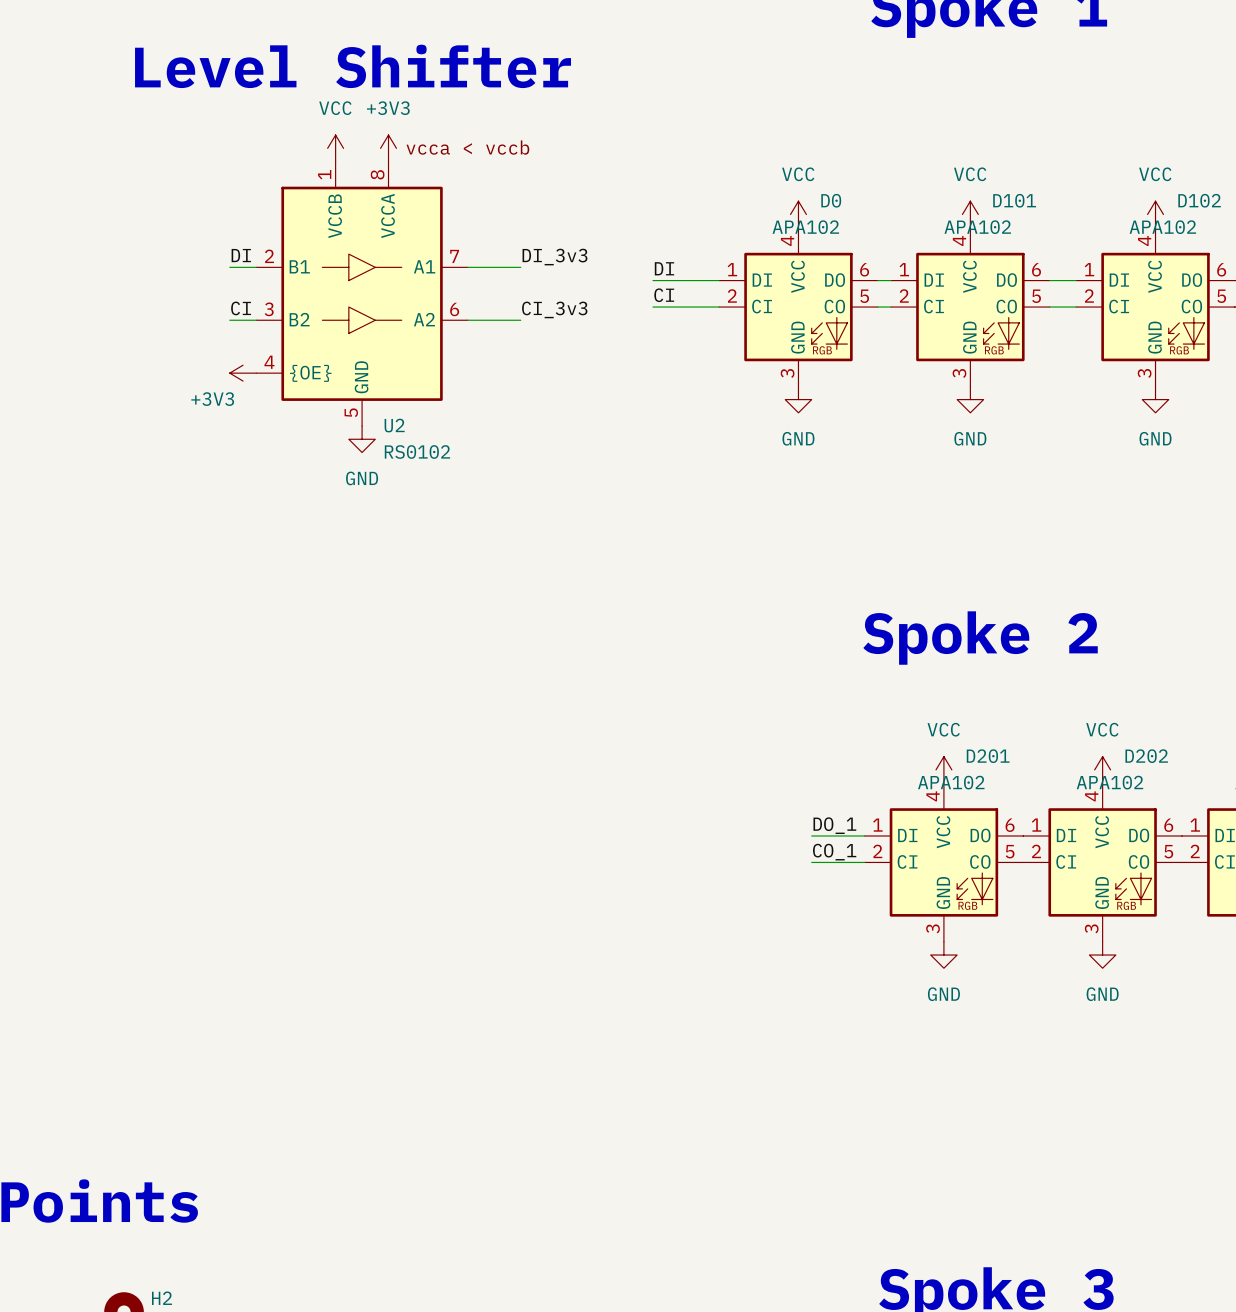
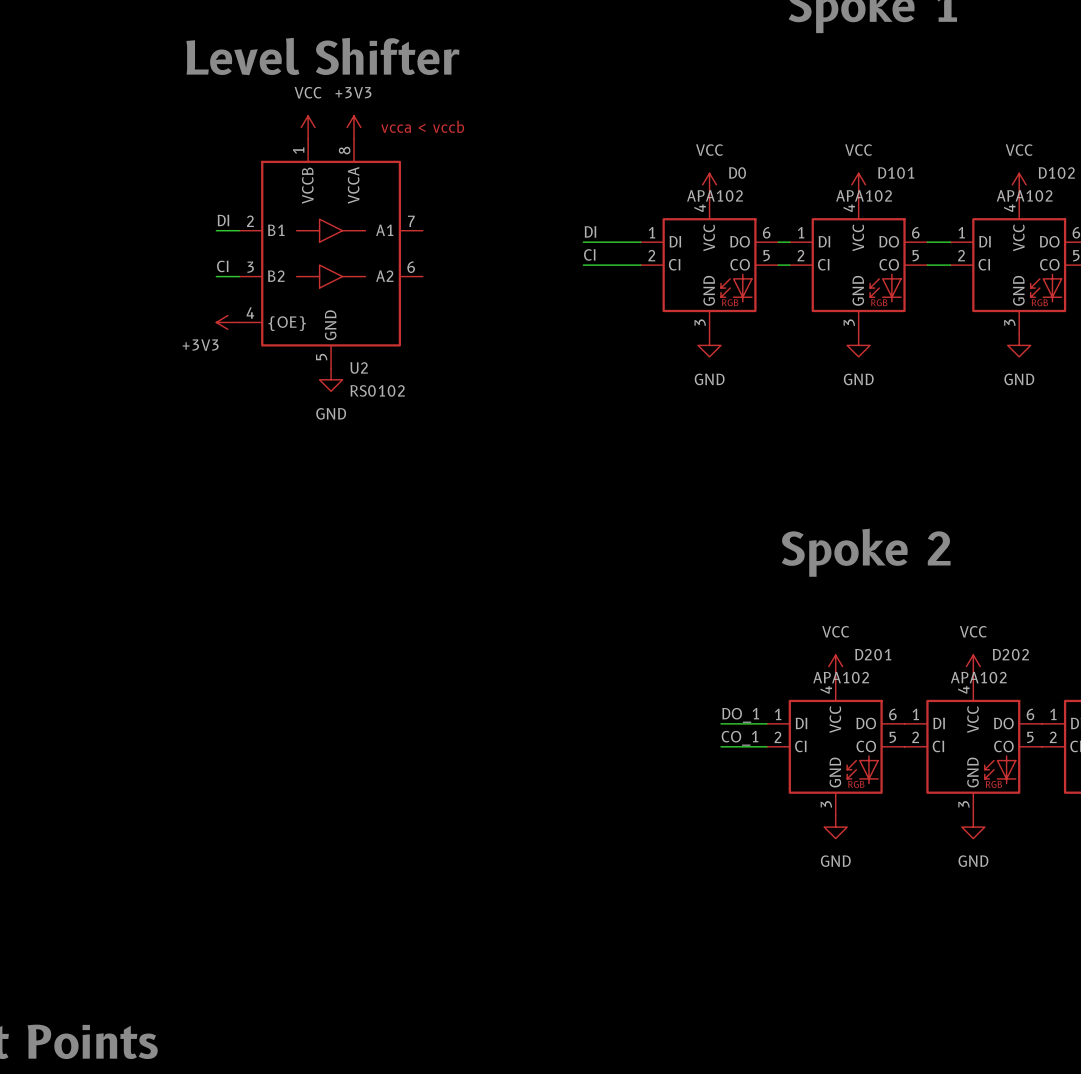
label: DI_3v3 (554, 257) -> none
wire: (467, 267) (520, 267) -> none
label: CI_3v3 (554, 309) -> none
wire: (467, 320) (520, 320) -> none

